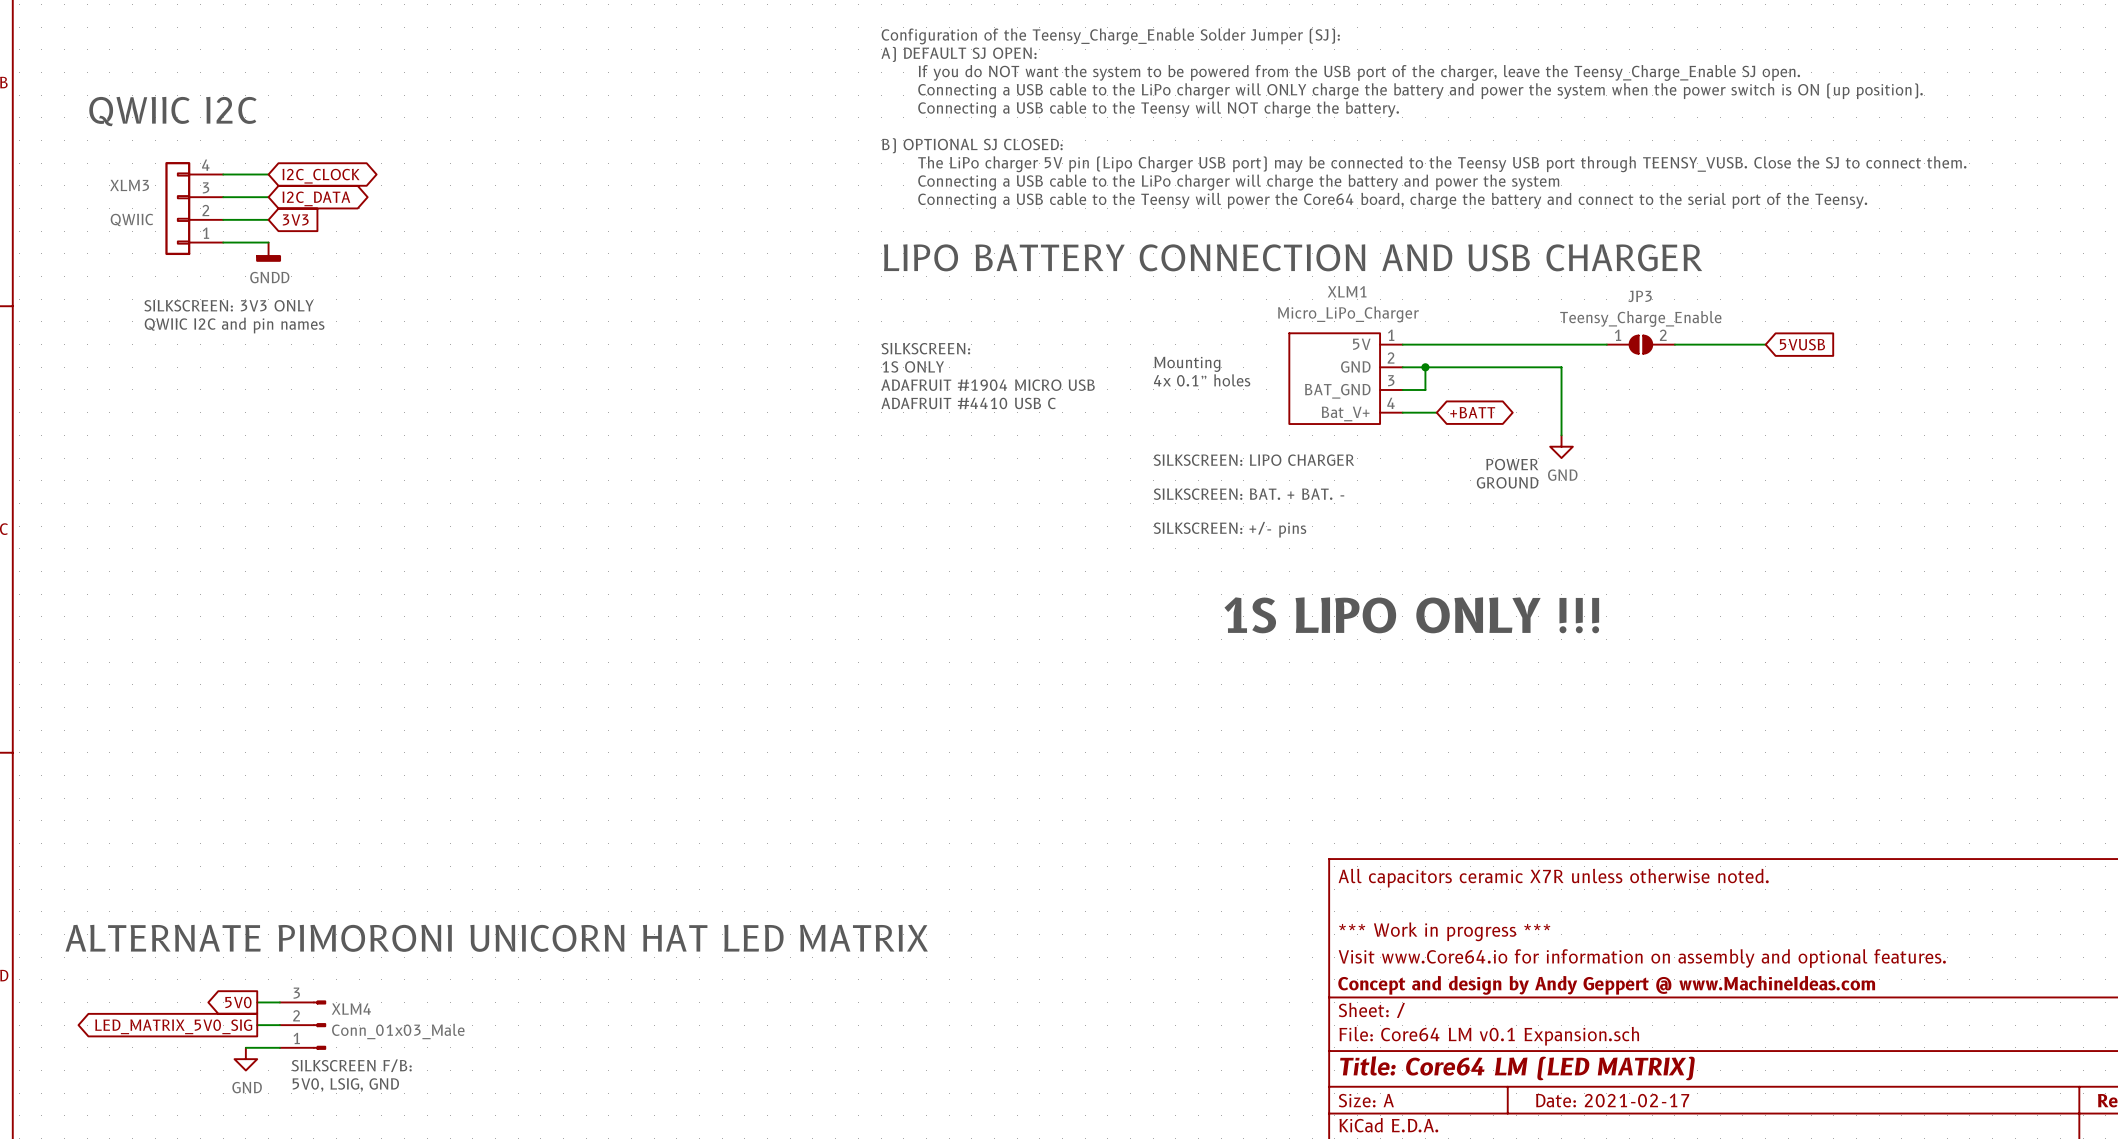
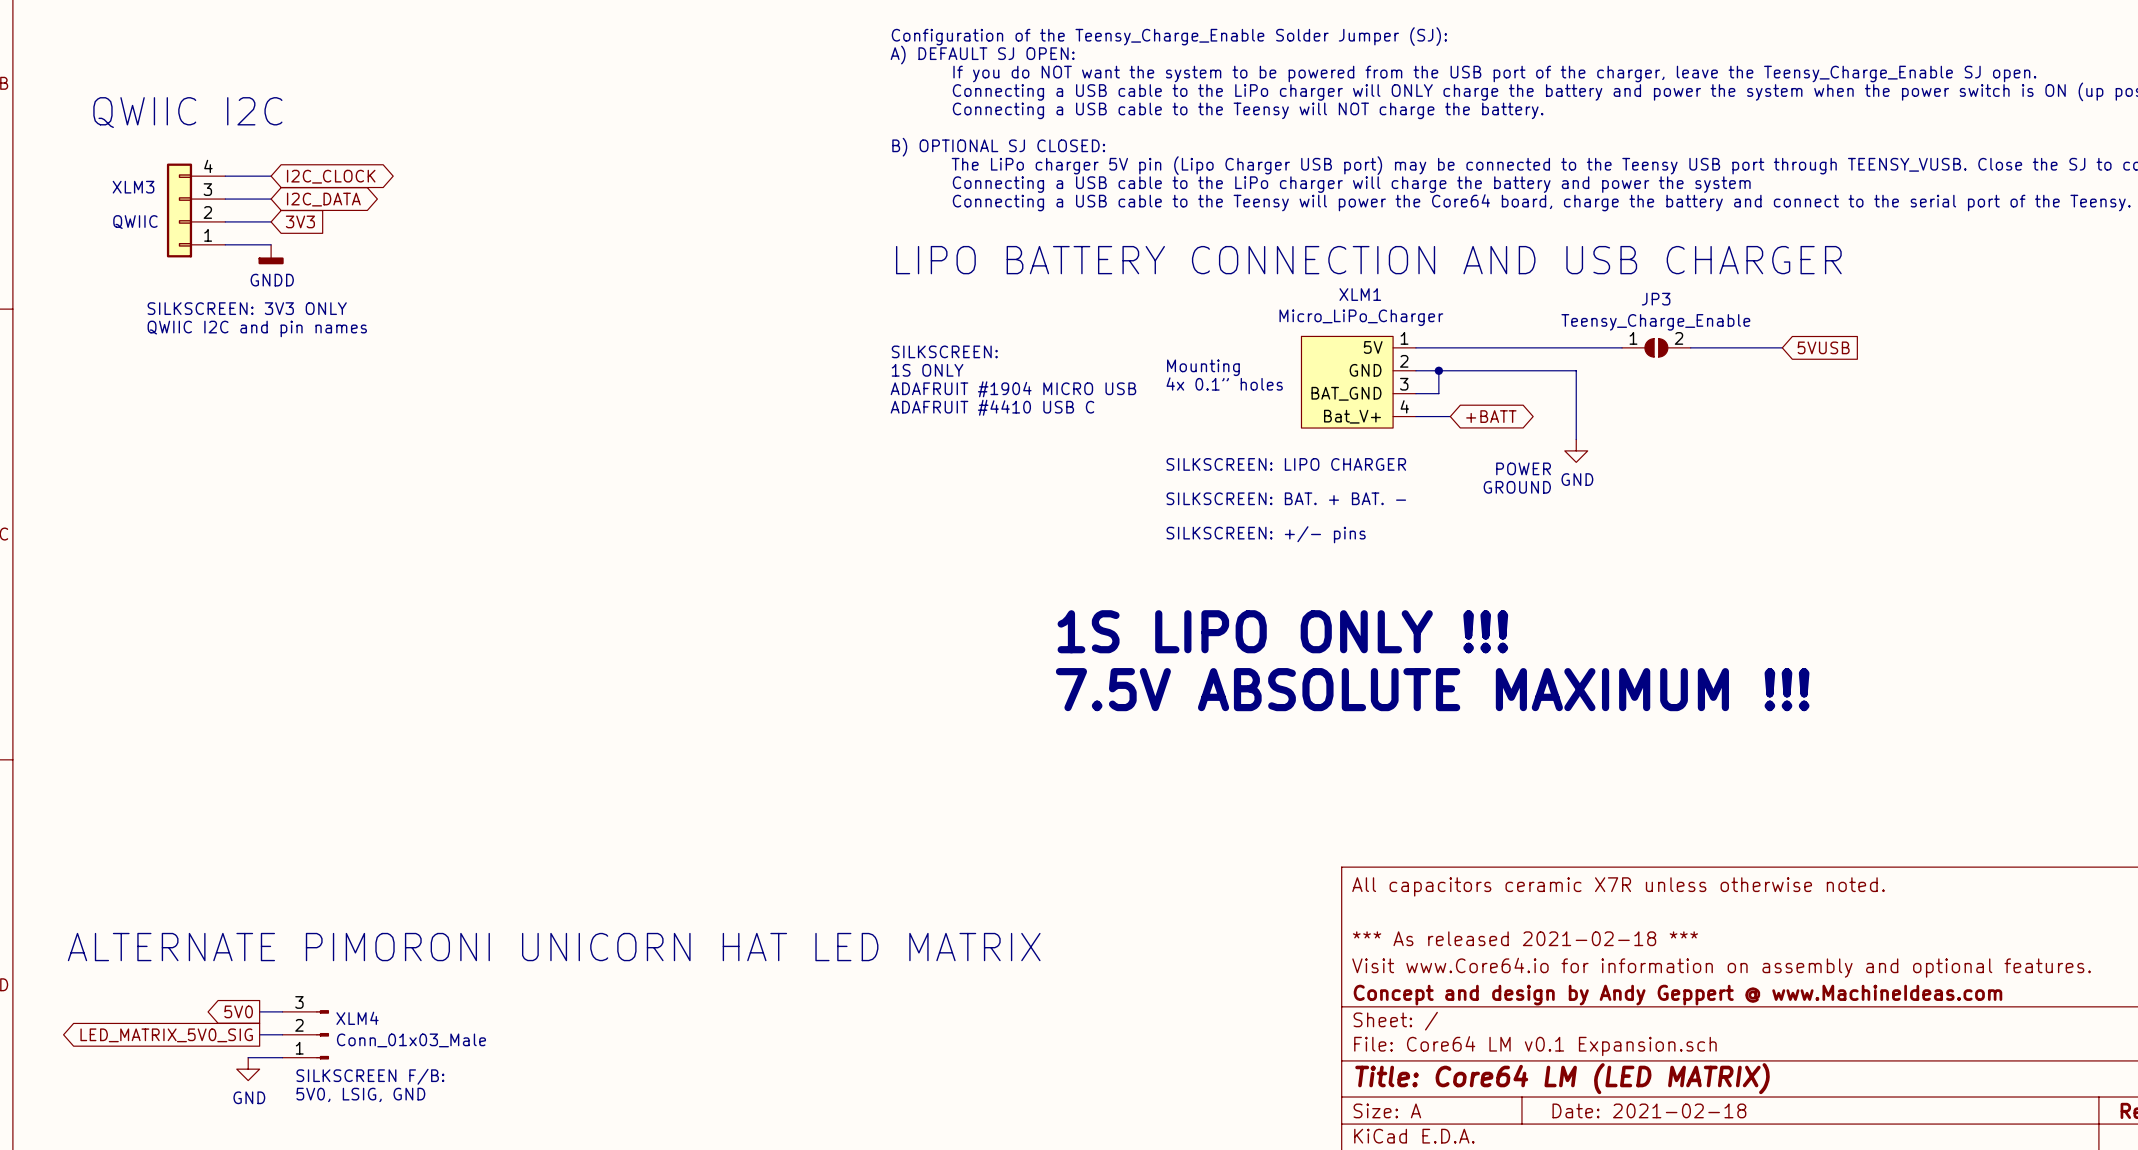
text position: 1S LIPO ONLY !!! (1411, 615) -> 1S LIPO ONLY !!! (1282, 631)
text: none -> 7.5V ABSOLUTE MAXIMUM !!! (1432, 689)
title block: *** Work in progress *** (1444, 931) -> *** As released 2021-02-18 *** (1525, 938)
title block: Date: 2021-02-17 (1612, 1100) -> Date: 2021-02-18 (1649, 1110)

